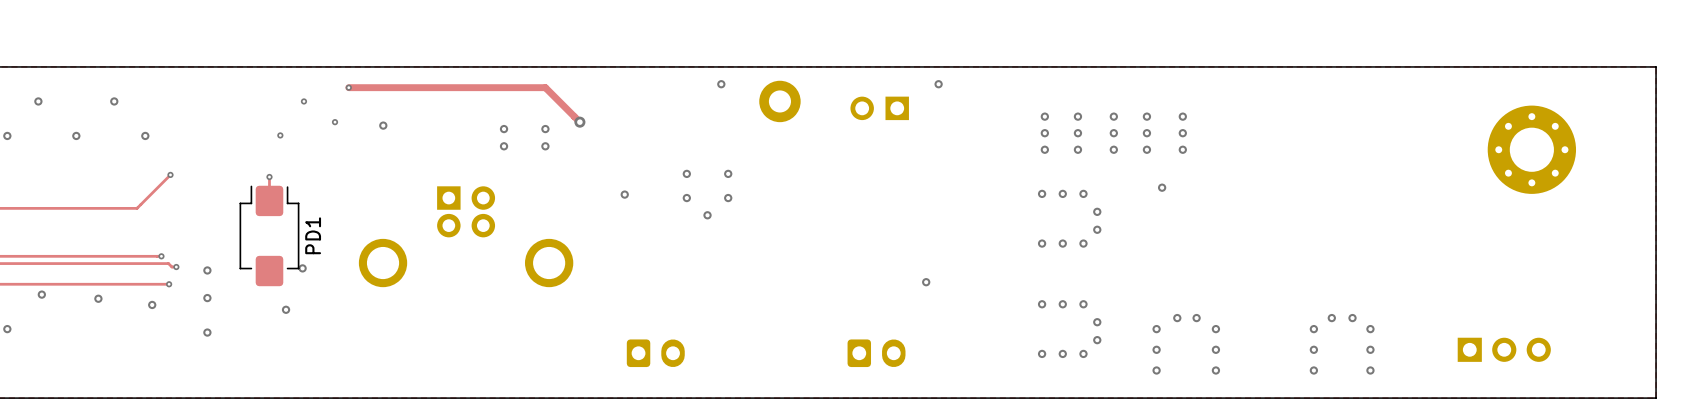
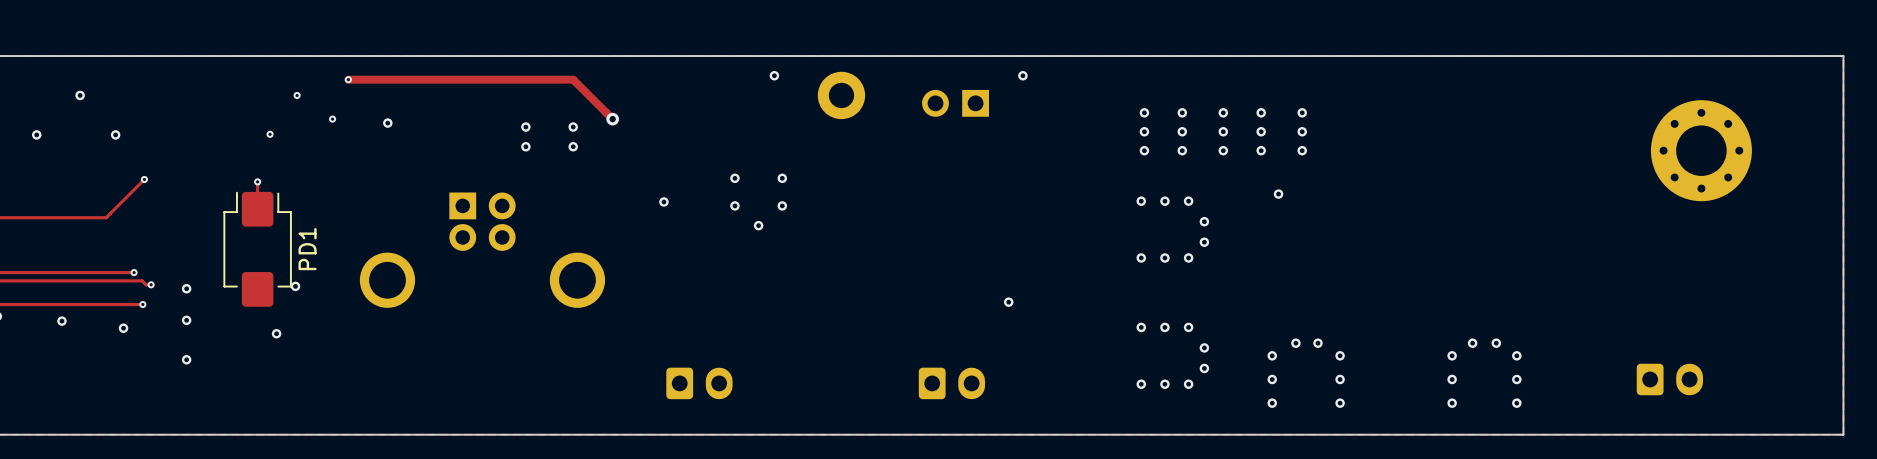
part footprint: [1457, 337, 1551, 362] -> [1636, 363, 1704, 396]

